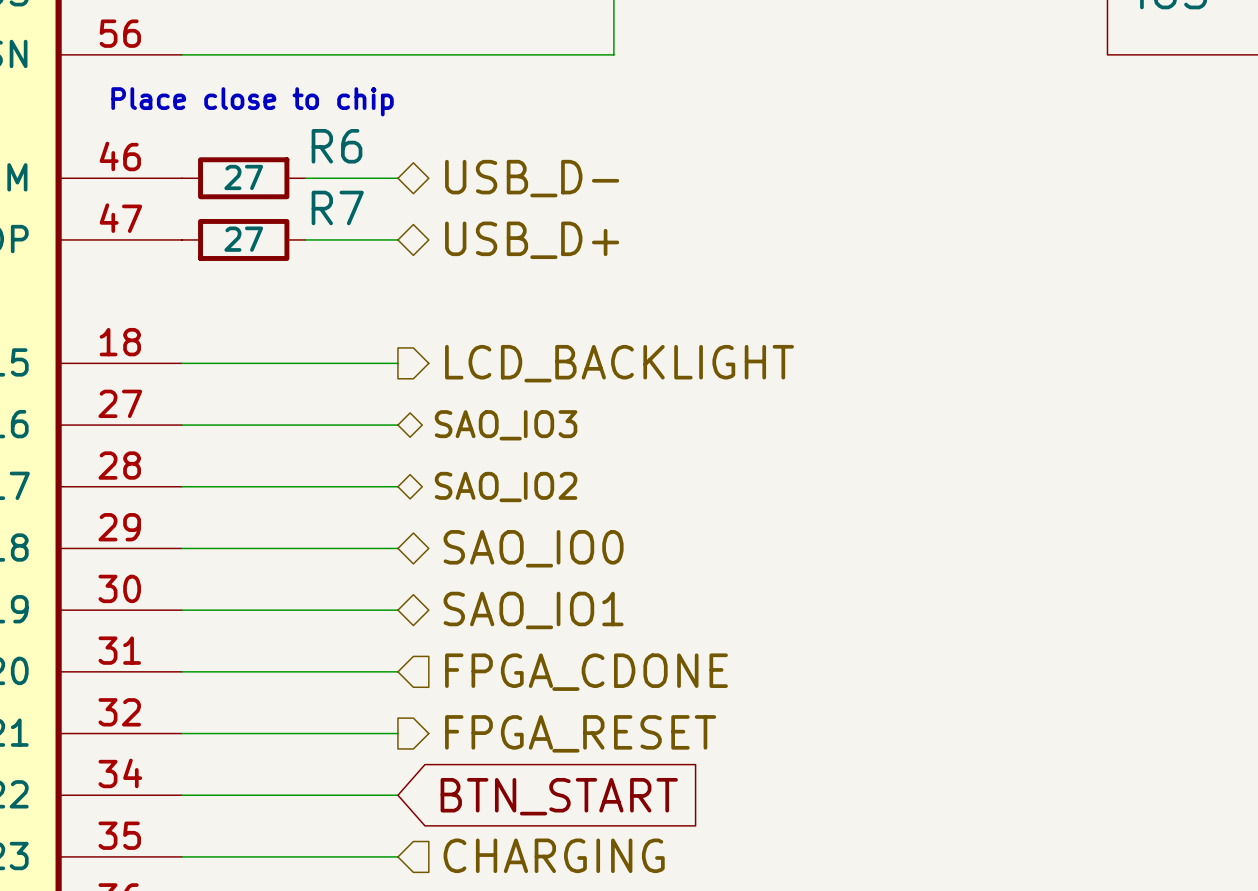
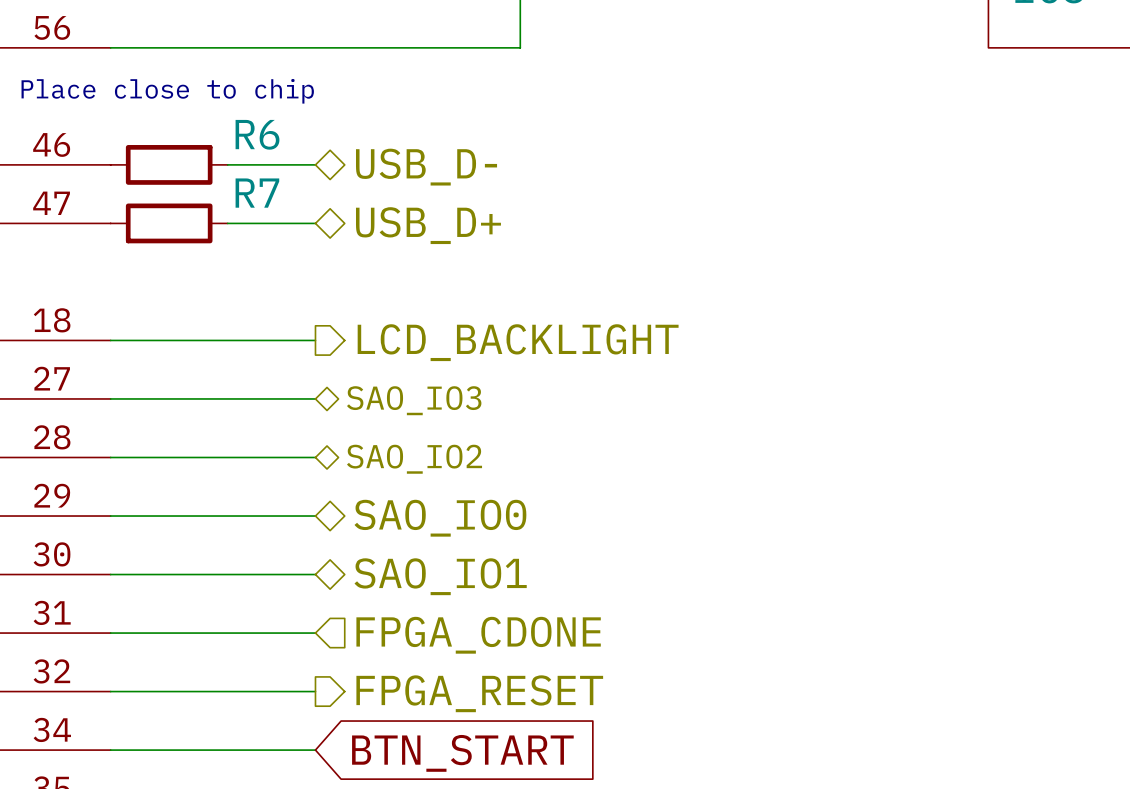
R6 value: 27 (243, 177) -> none
R7 value: 27 (243, 239) -> none

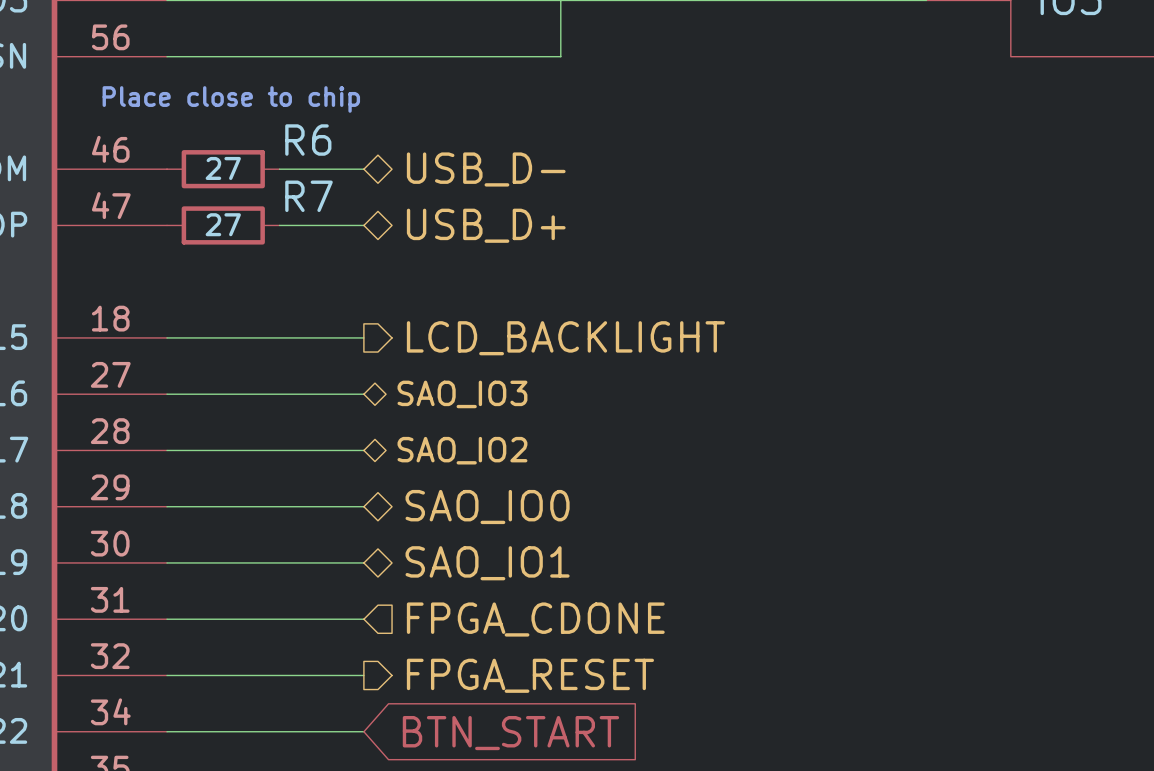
R6 value: none -> 27 (223, 168)
R7 value: none -> 27 (223, 224)

